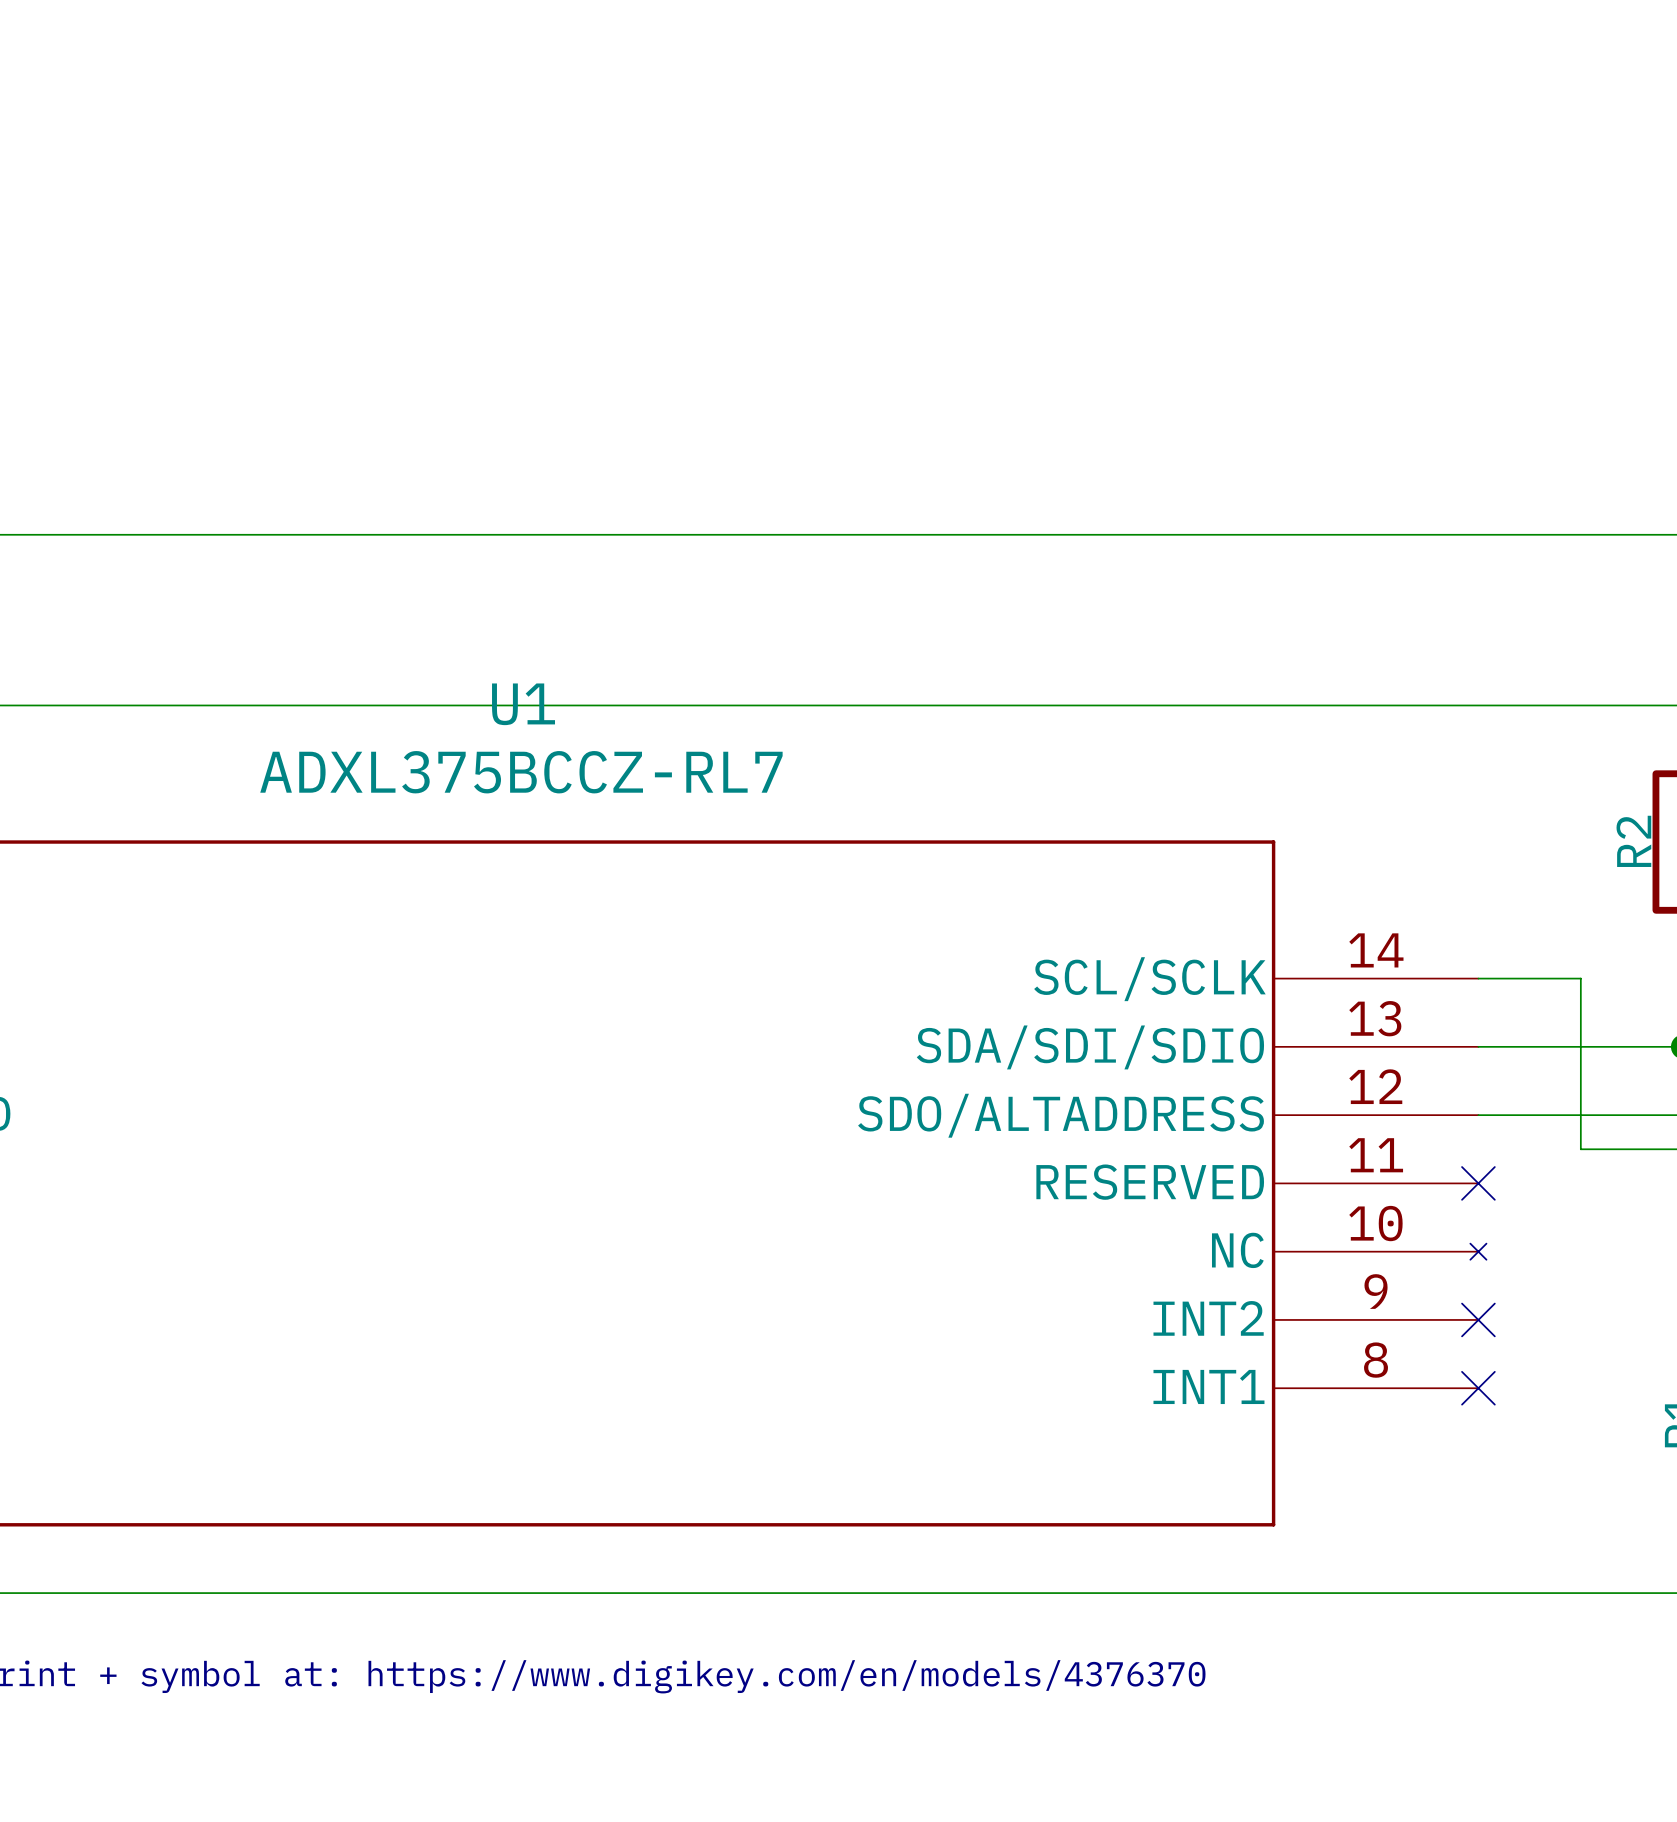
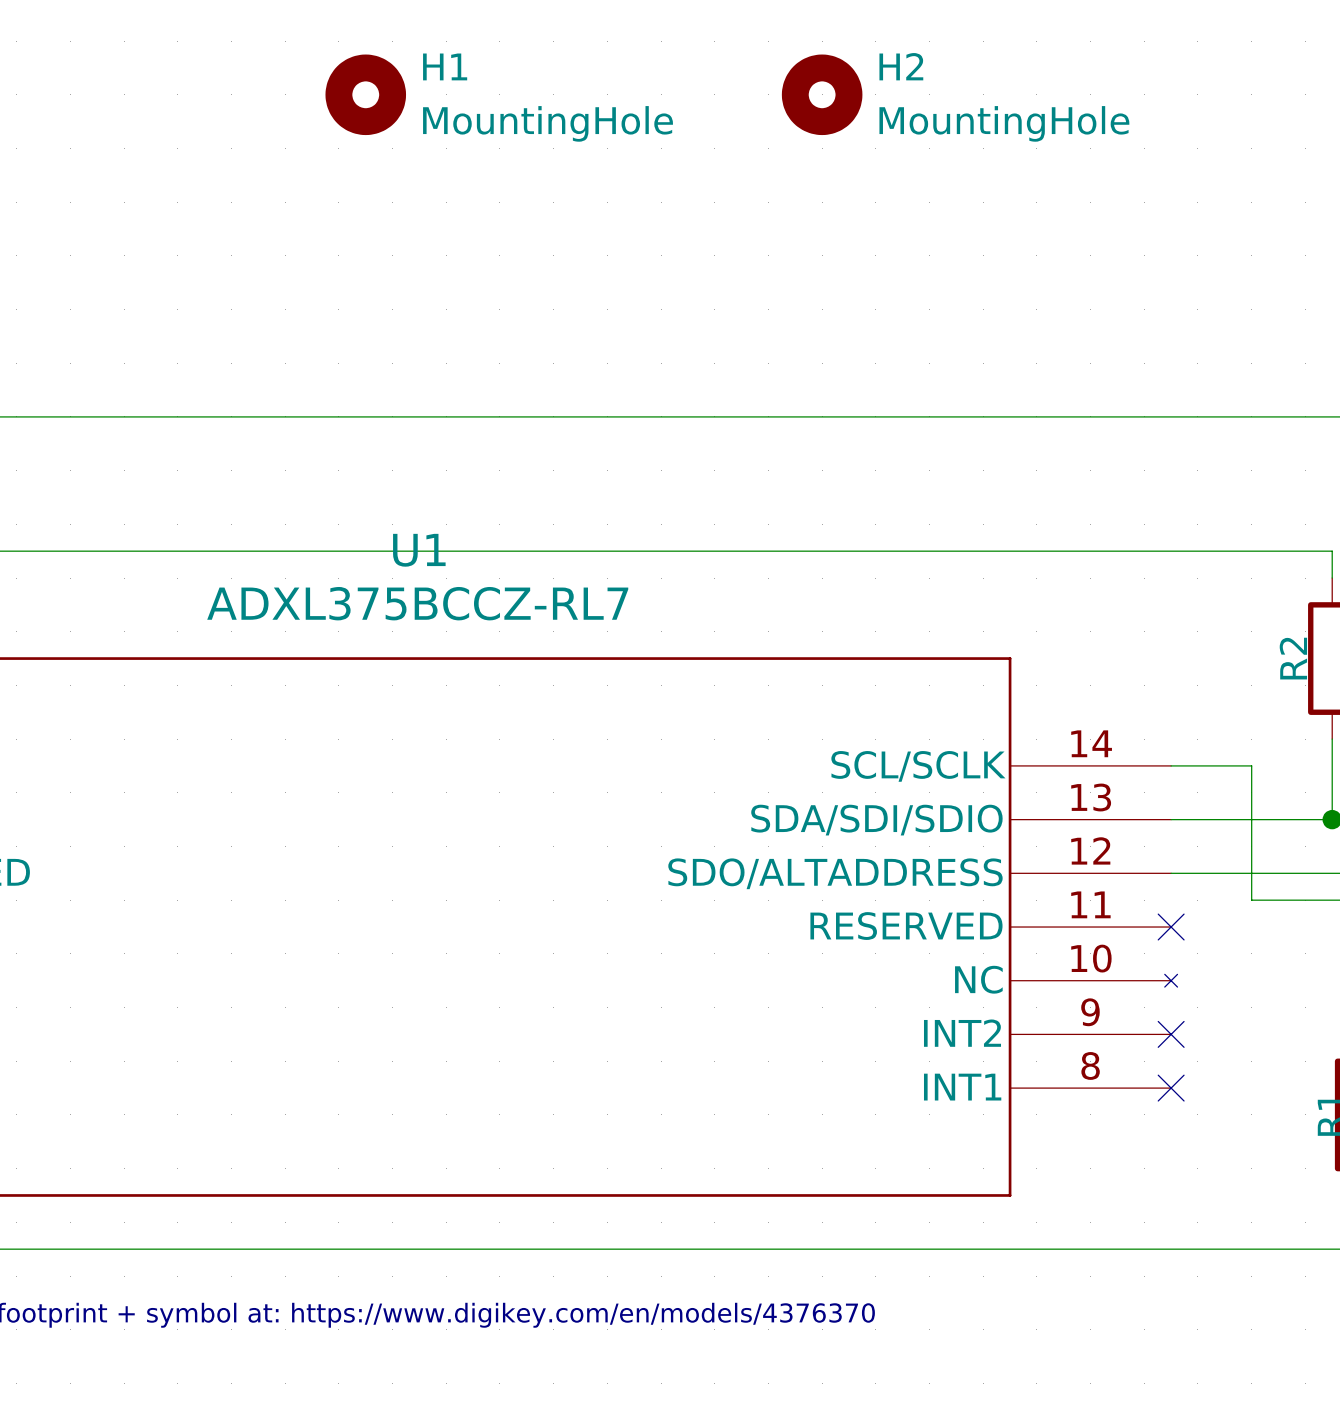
H1: none -> MountingHole (365, 94)
H2: none -> MountingHole (822, 94)

